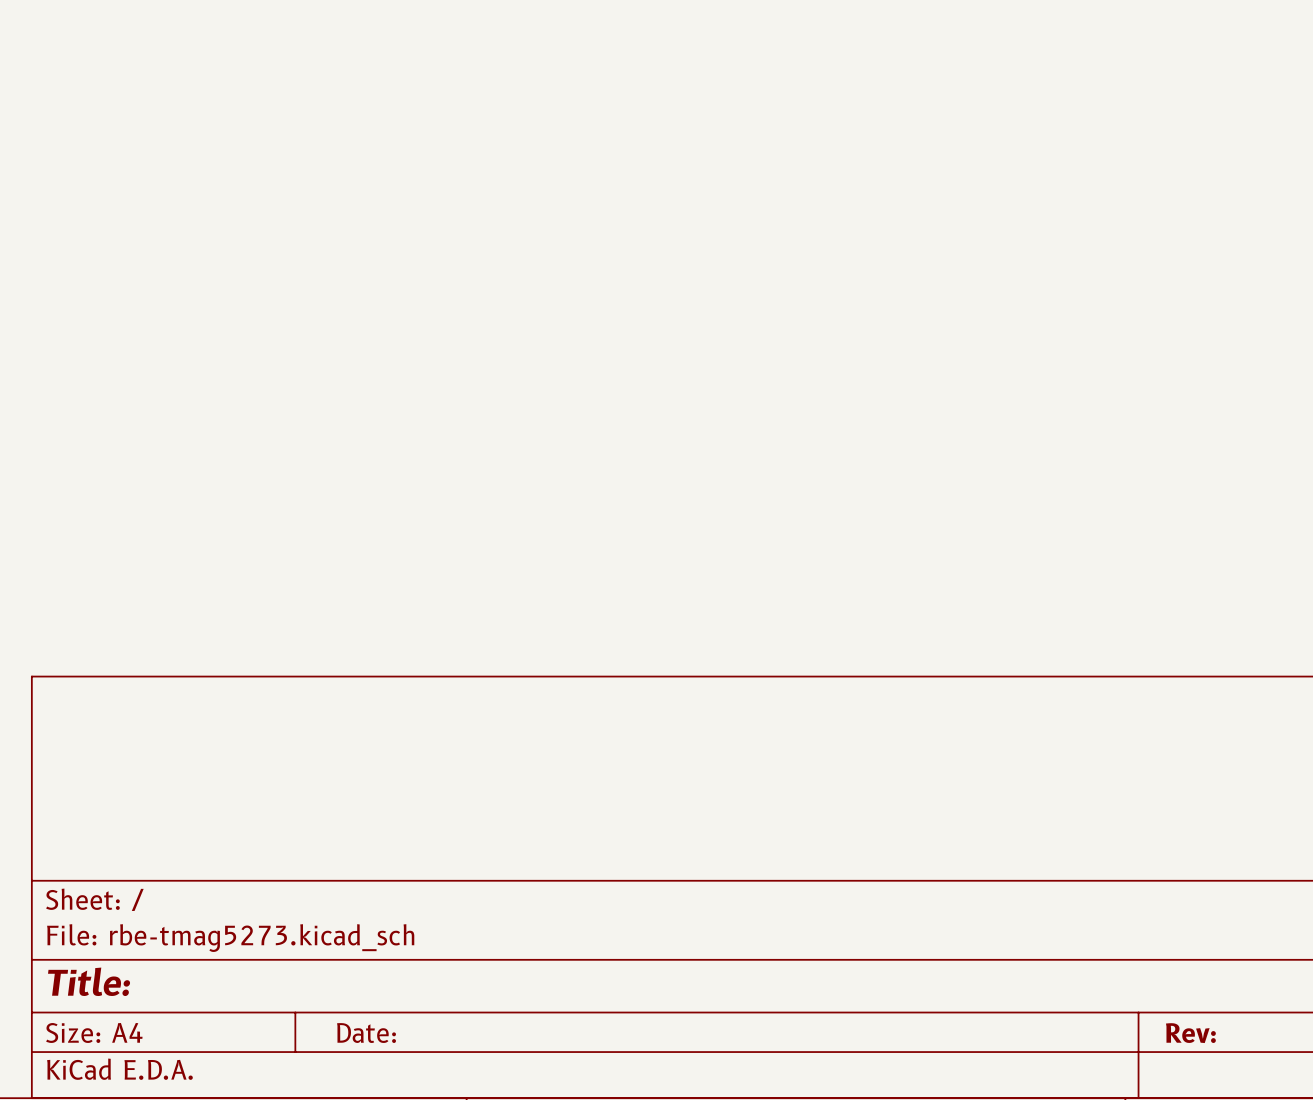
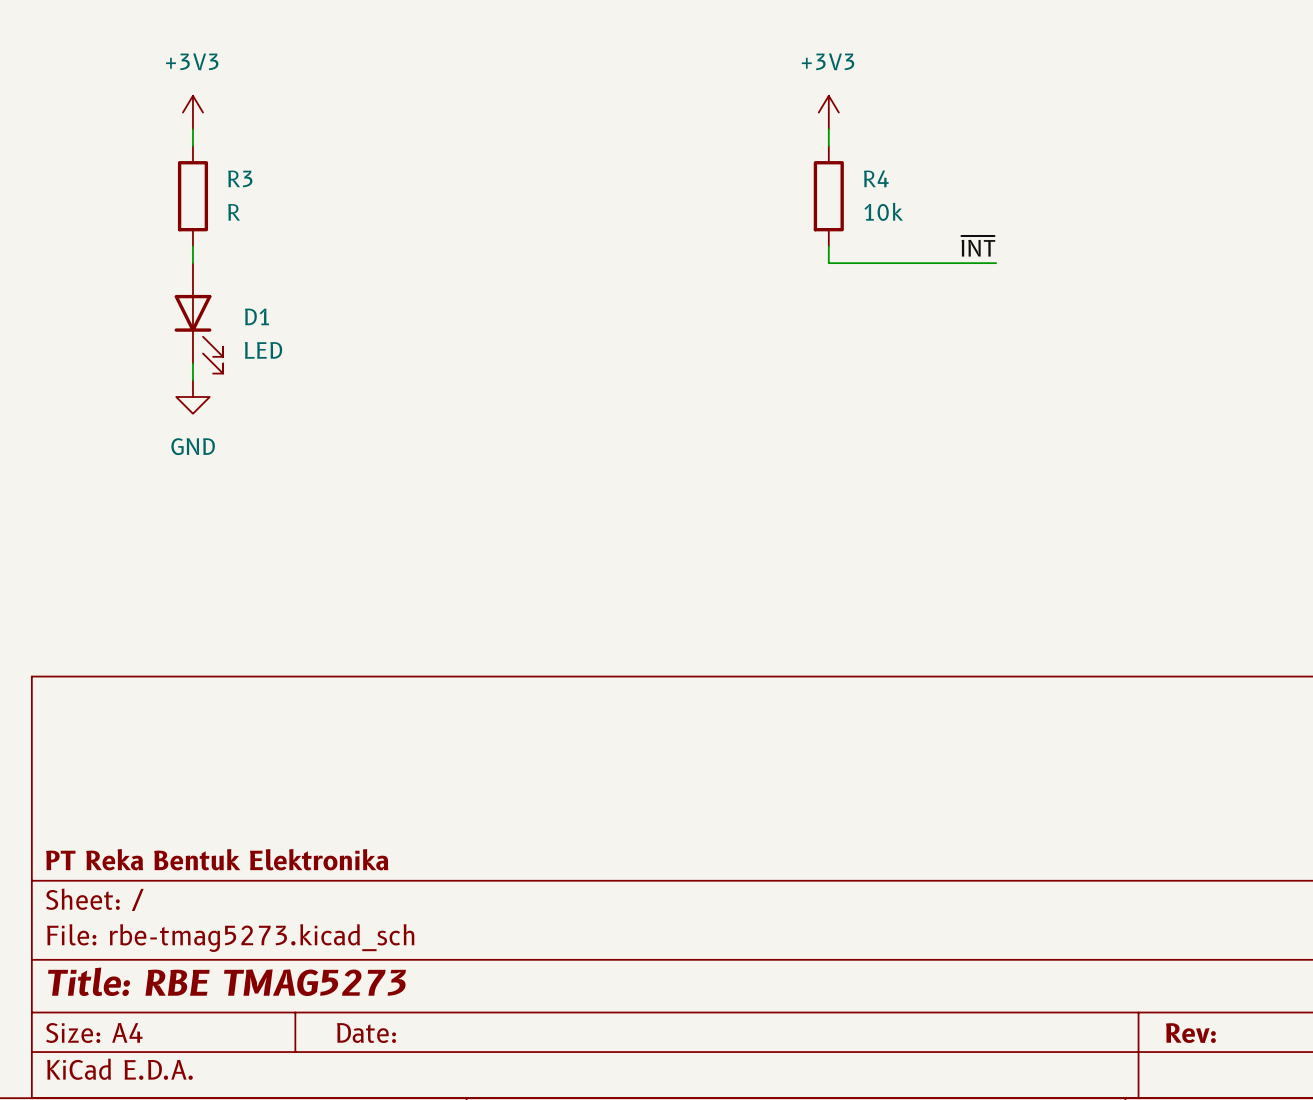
power symbol: none -> +3V3 (192, 112)
power symbol: none -> +3V3 (828, 112)
wire: none -> (192, 129) (192, 146)
wire: none -> (828, 129) (828, 146)
R3: none -> R (192, 196)
R4: none -> 10k (828, 196)
wire: none -> (192, 246) (192, 263)
wire: none -> (828, 246) (828, 263) (996, 263)
label: none -> ~{INT} (978, 246)
D1: none -> LED (198, 318)
wire: none -> (192, 363) (192, 380)
power symbol: none -> GND (192, 396)
title block: none -> PT Reka Bentuk Elektronika (217, 859)
title block: Title: (89, 981) -> Title: RBE TMAG5273 (226, 981)

